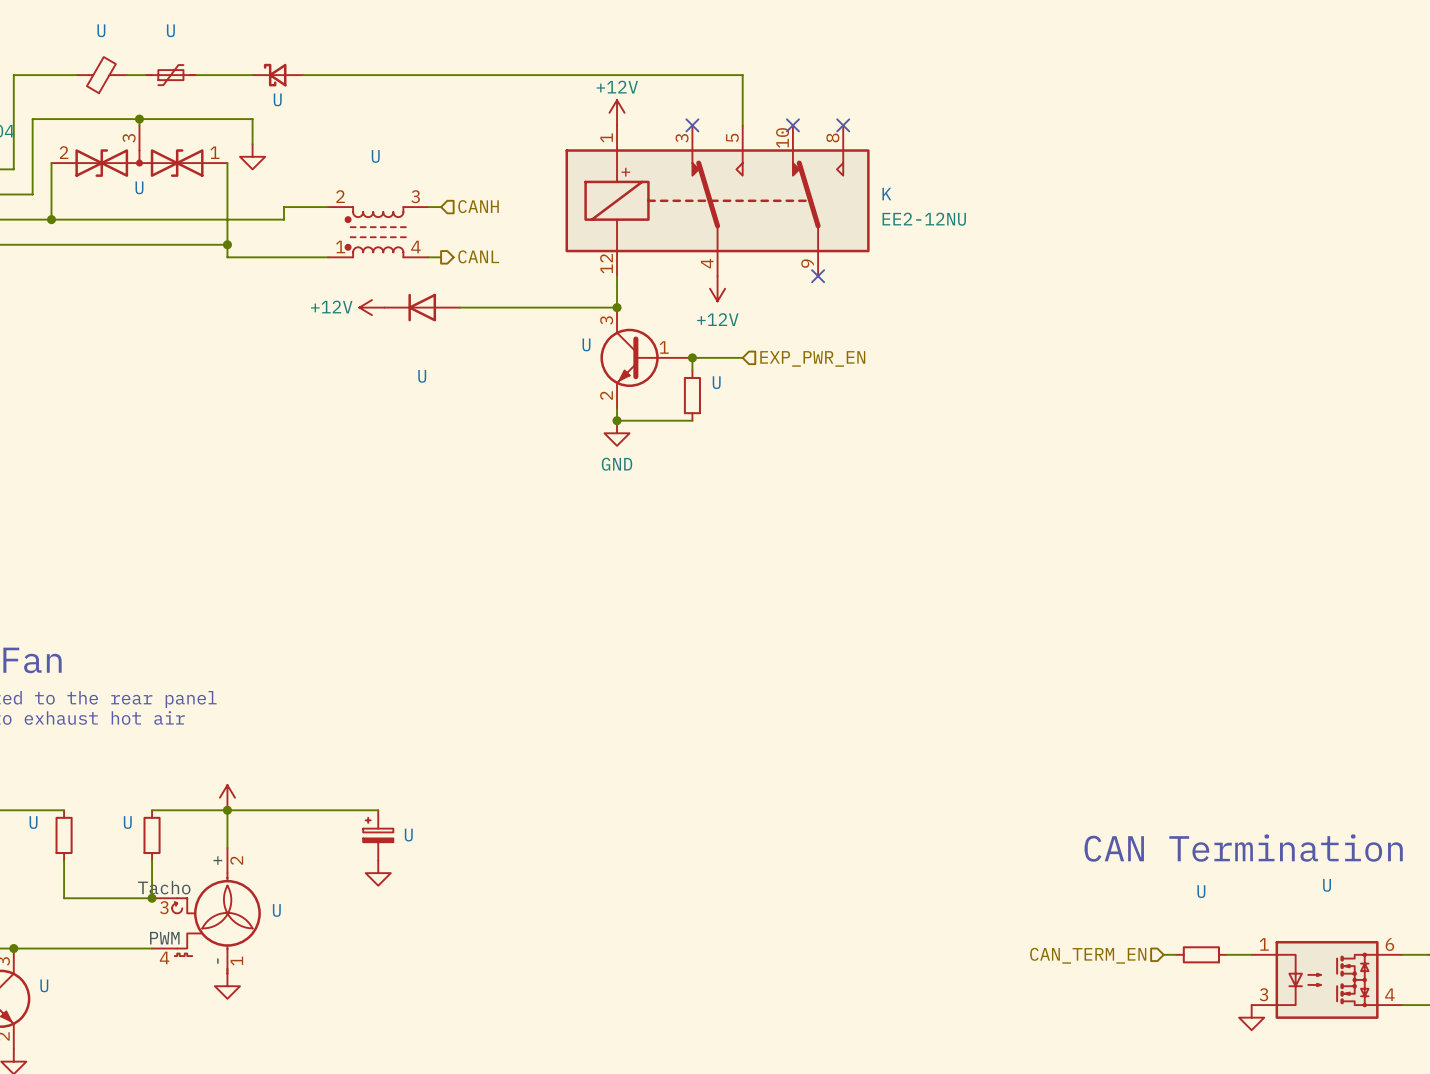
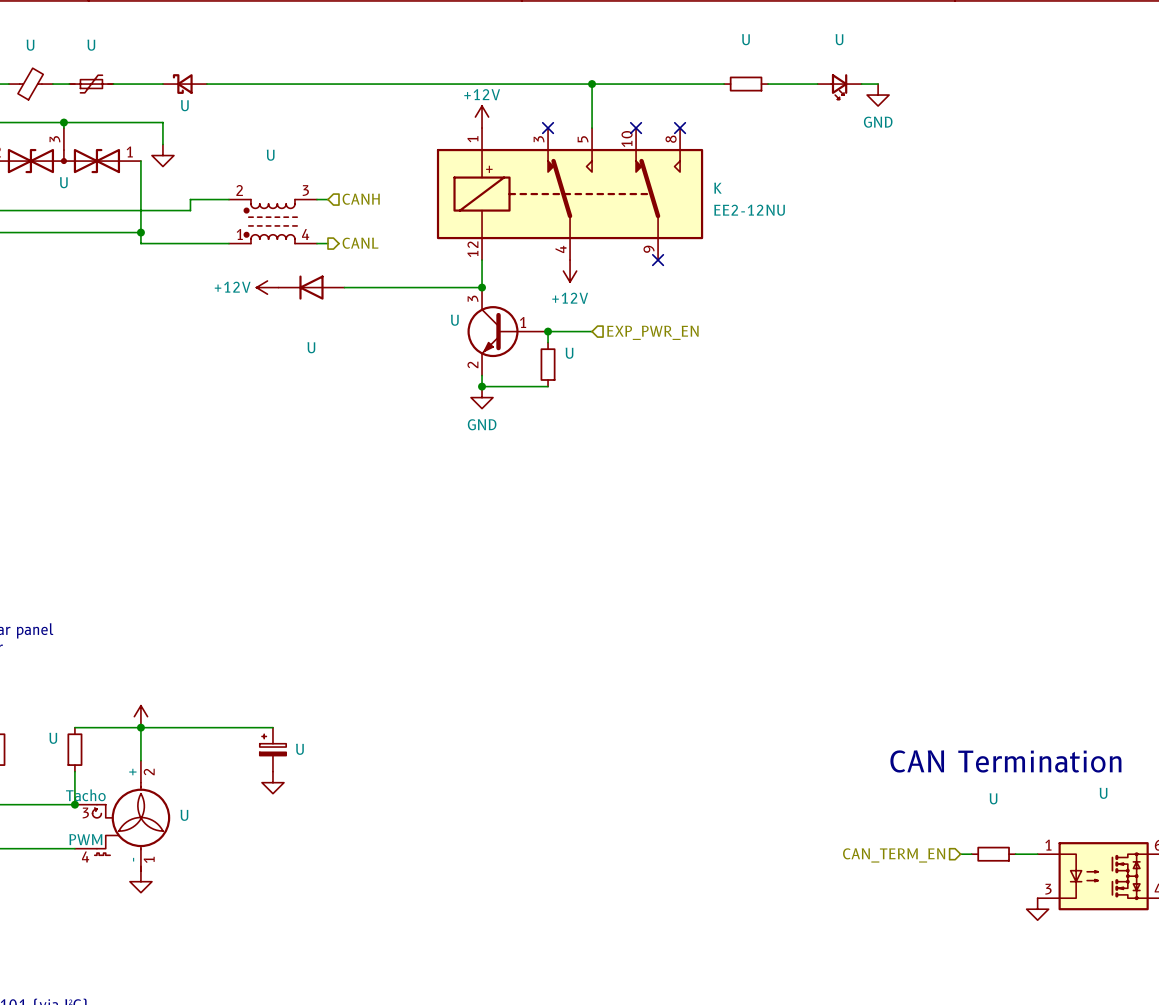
wire: none -> (592, 84) (724, 84)
junction: none -> (592, 84)
U: none -> (746, 84)
wire: none -> (768, 84) (817, 84)
wire: none -> (861, 84) (878, 84)
U: none -> (839, 86)
power symbol: none -> GND (878, 95)

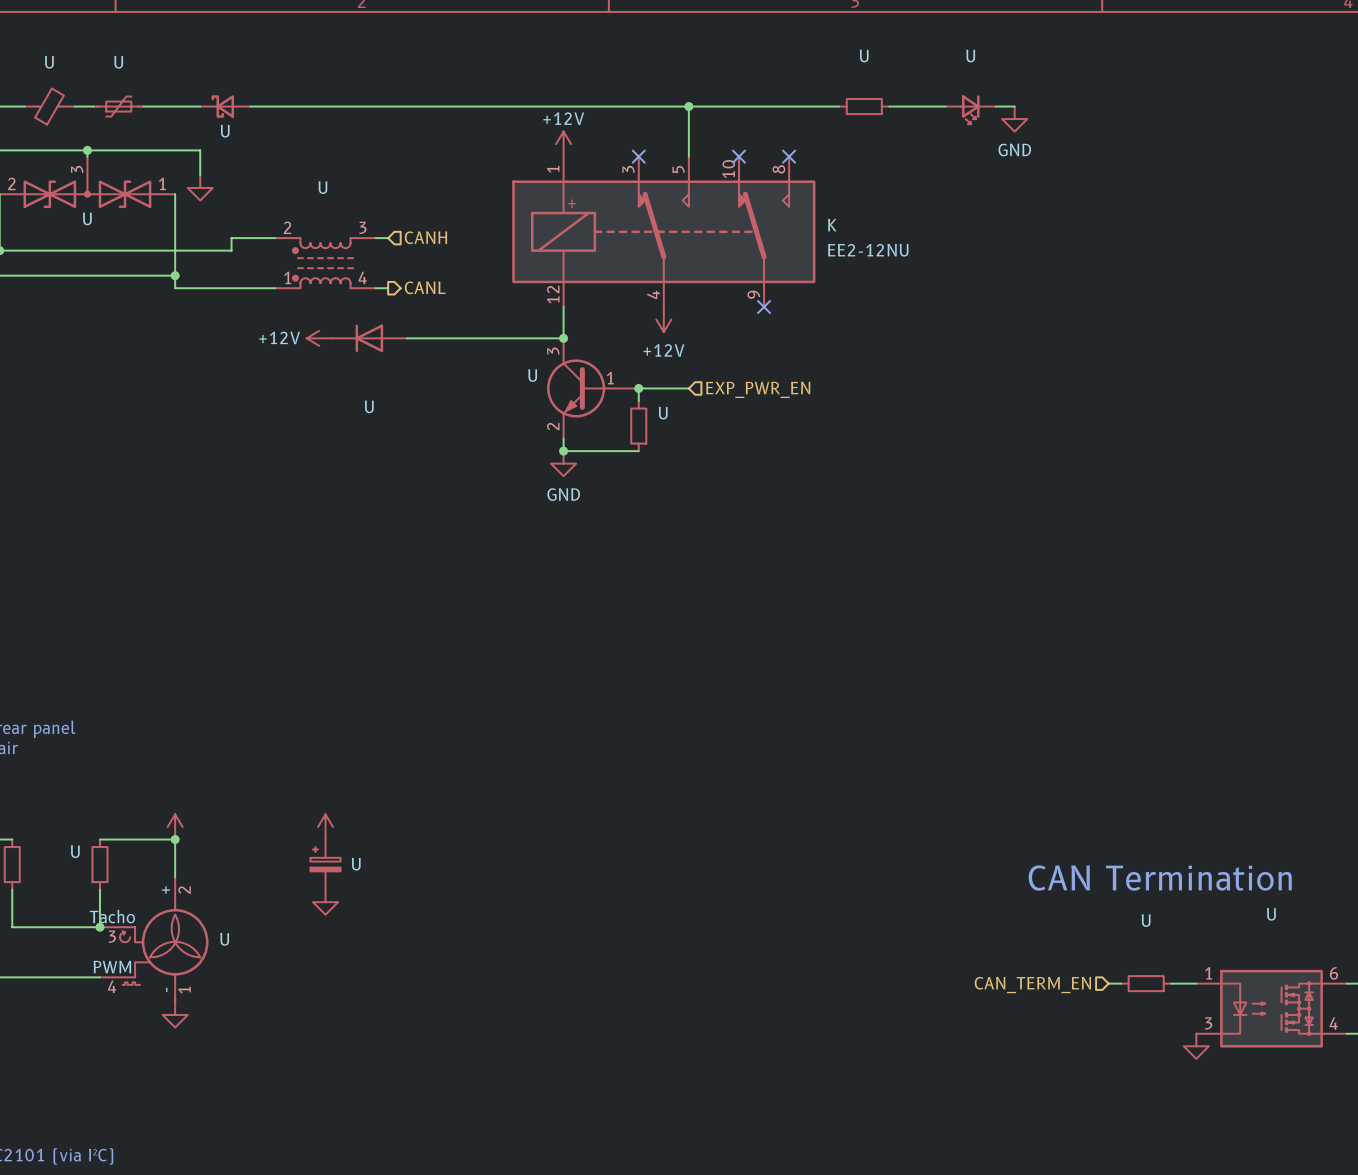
power symbol: none -> (325, 827)
wire: (140, 727) (272, 727) -> none

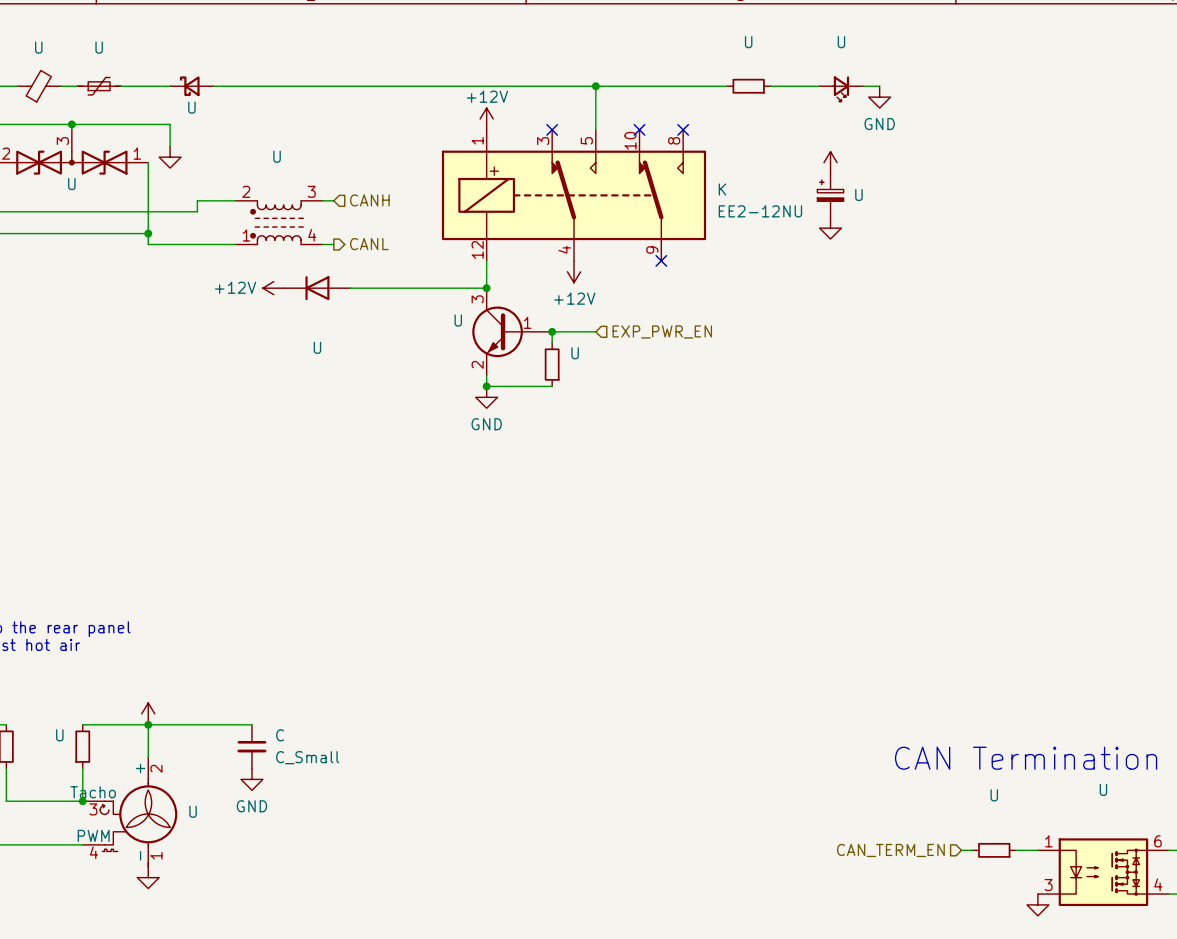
power symbol: none -> (830, 162)
U: none -> (830, 195)
power symbol: none -> (830, 228)
power symbol: (325, 827) -> none
wire: none -> (148, 724) (251, 724)
C: none -> C_Small (251, 746)
U: (325, 864) -> none
power symbol: none -> GND (251, 779)
power symbol: (325, 902) -> none

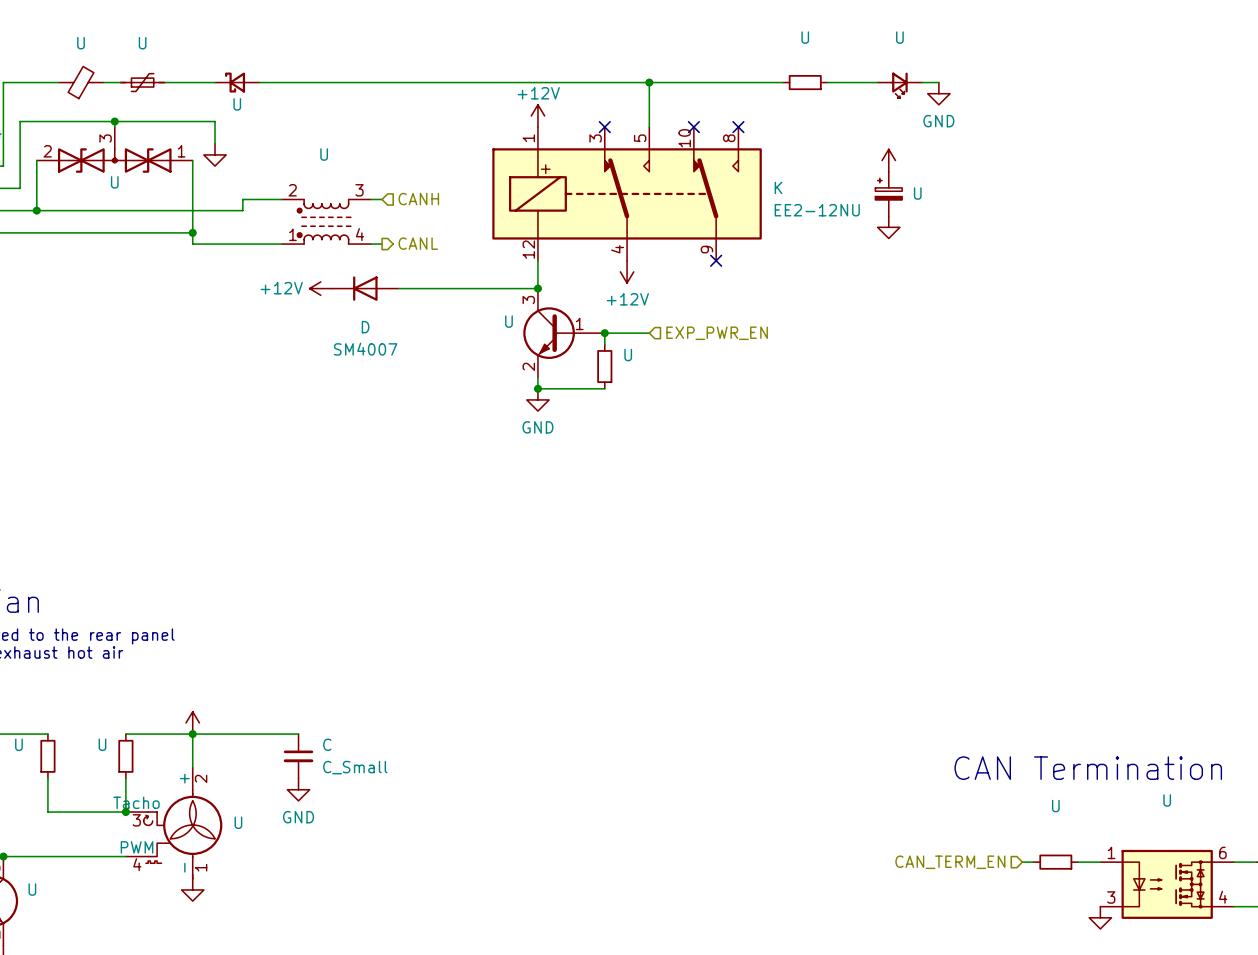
U name: U (317, 347) -> D (365, 327)
U value: none -> SM4007 (365, 349)

